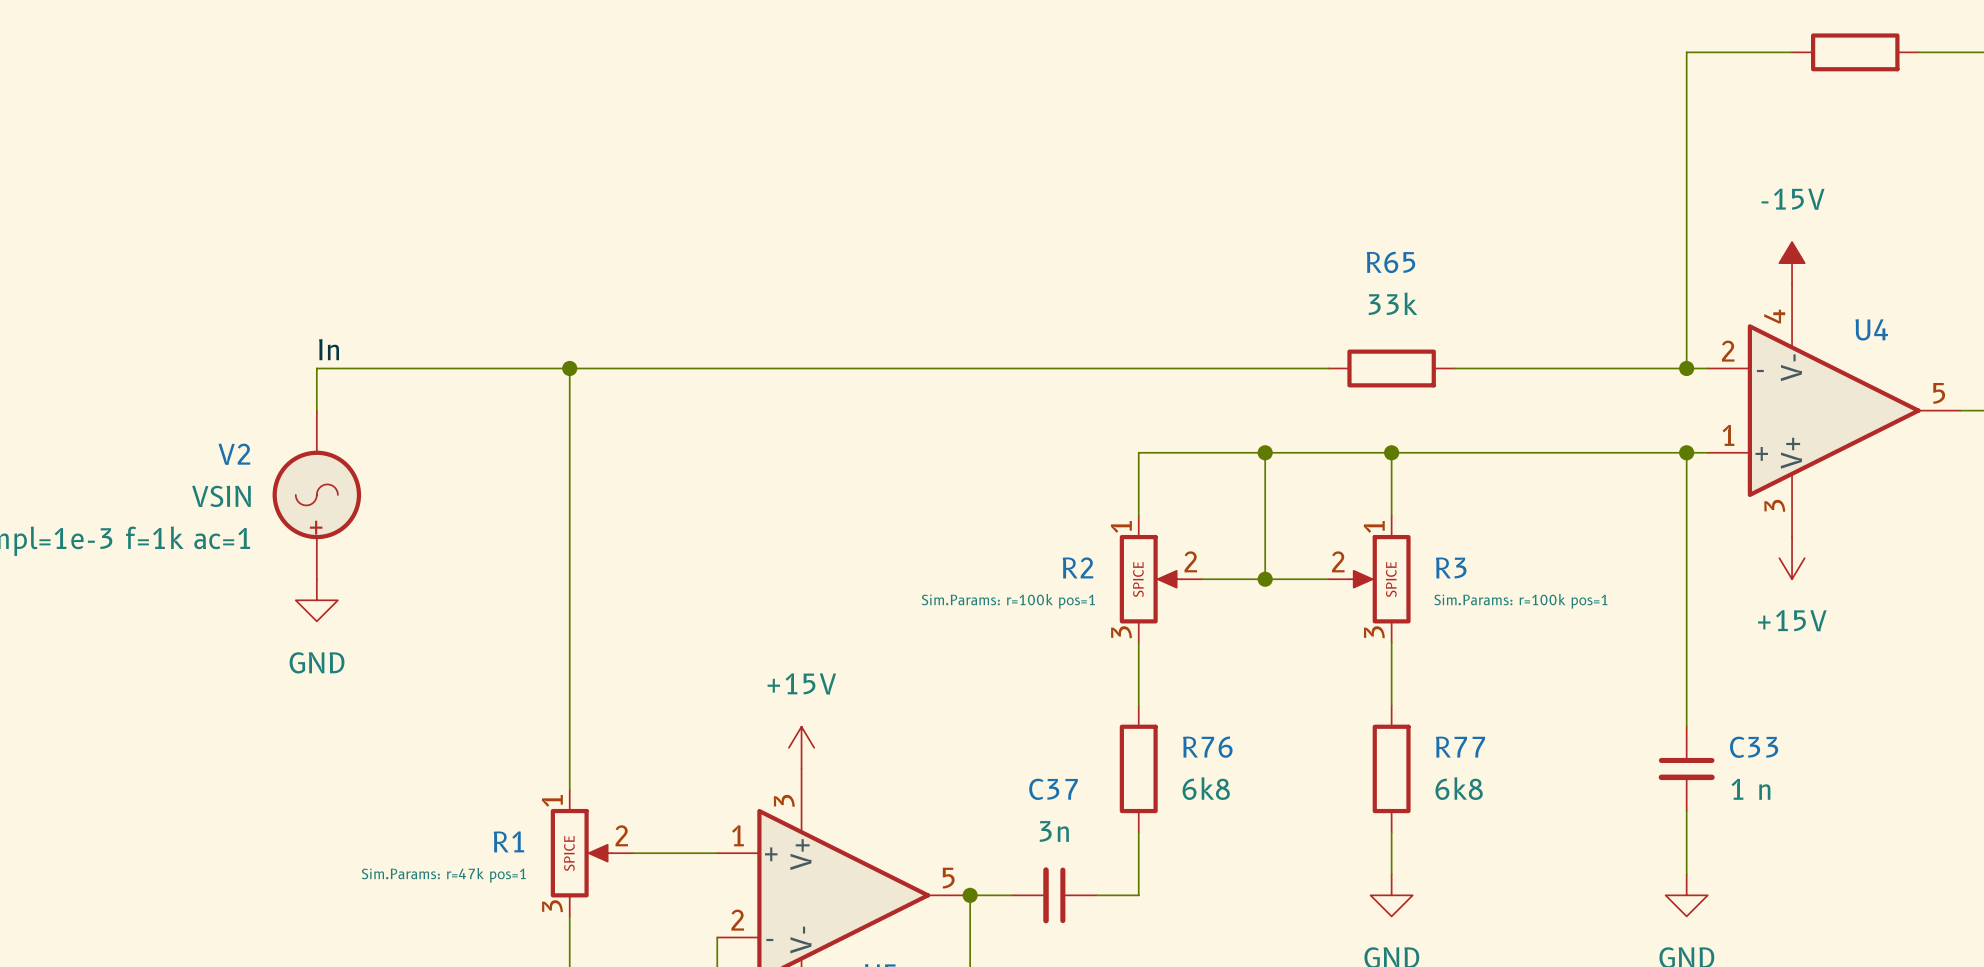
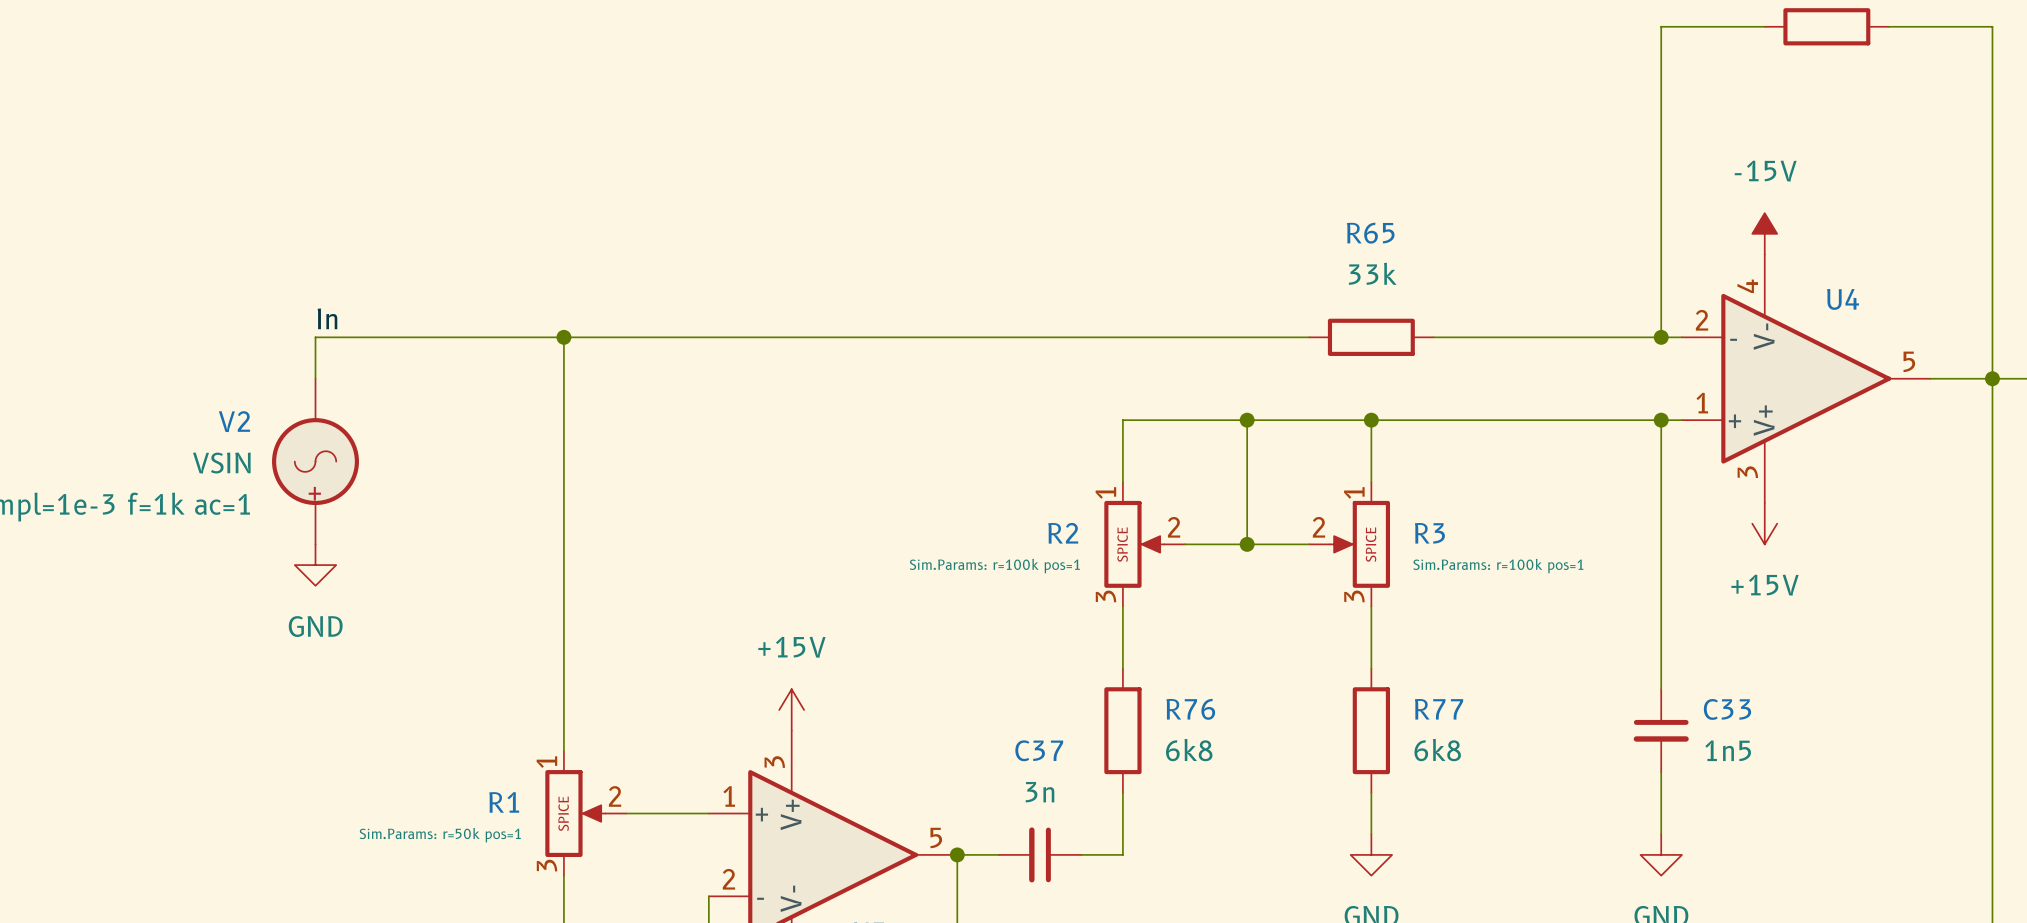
C33 value: 1 n (1750, 789) -> 1n5 (1728, 750)
R1 text: Sim.Params: r=47k pos=1 (443, 875) -> Sim.Params: r=50k pos=1 (440, 835)

